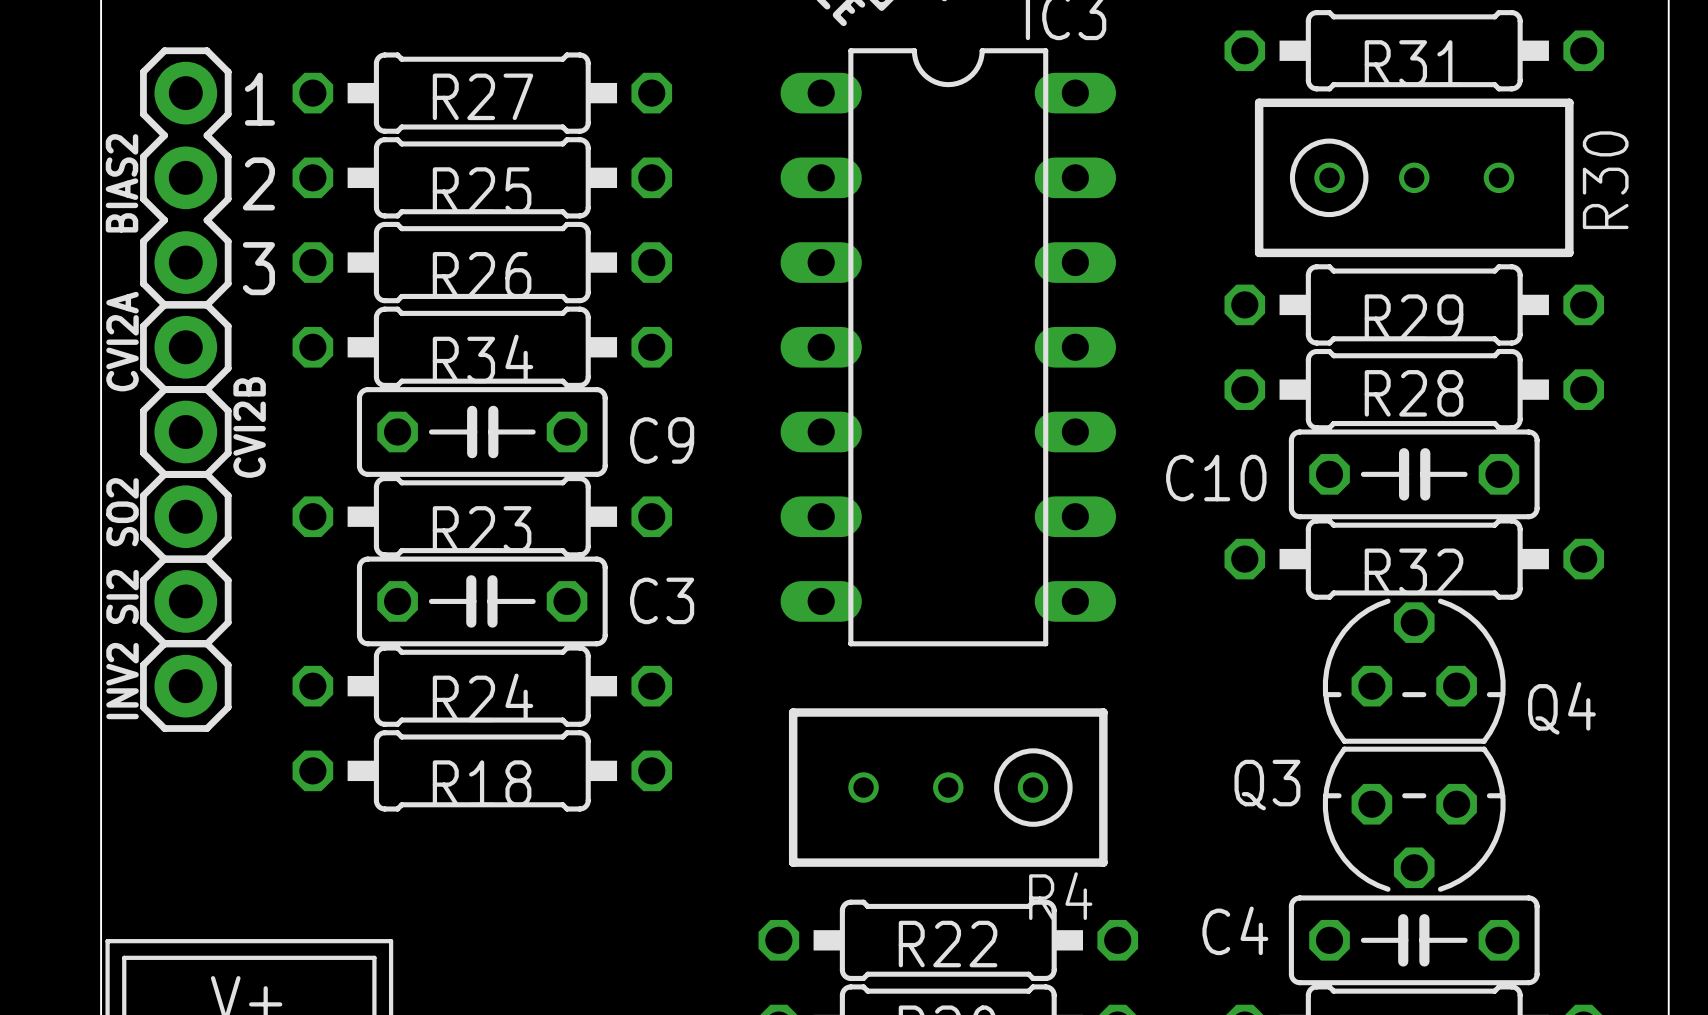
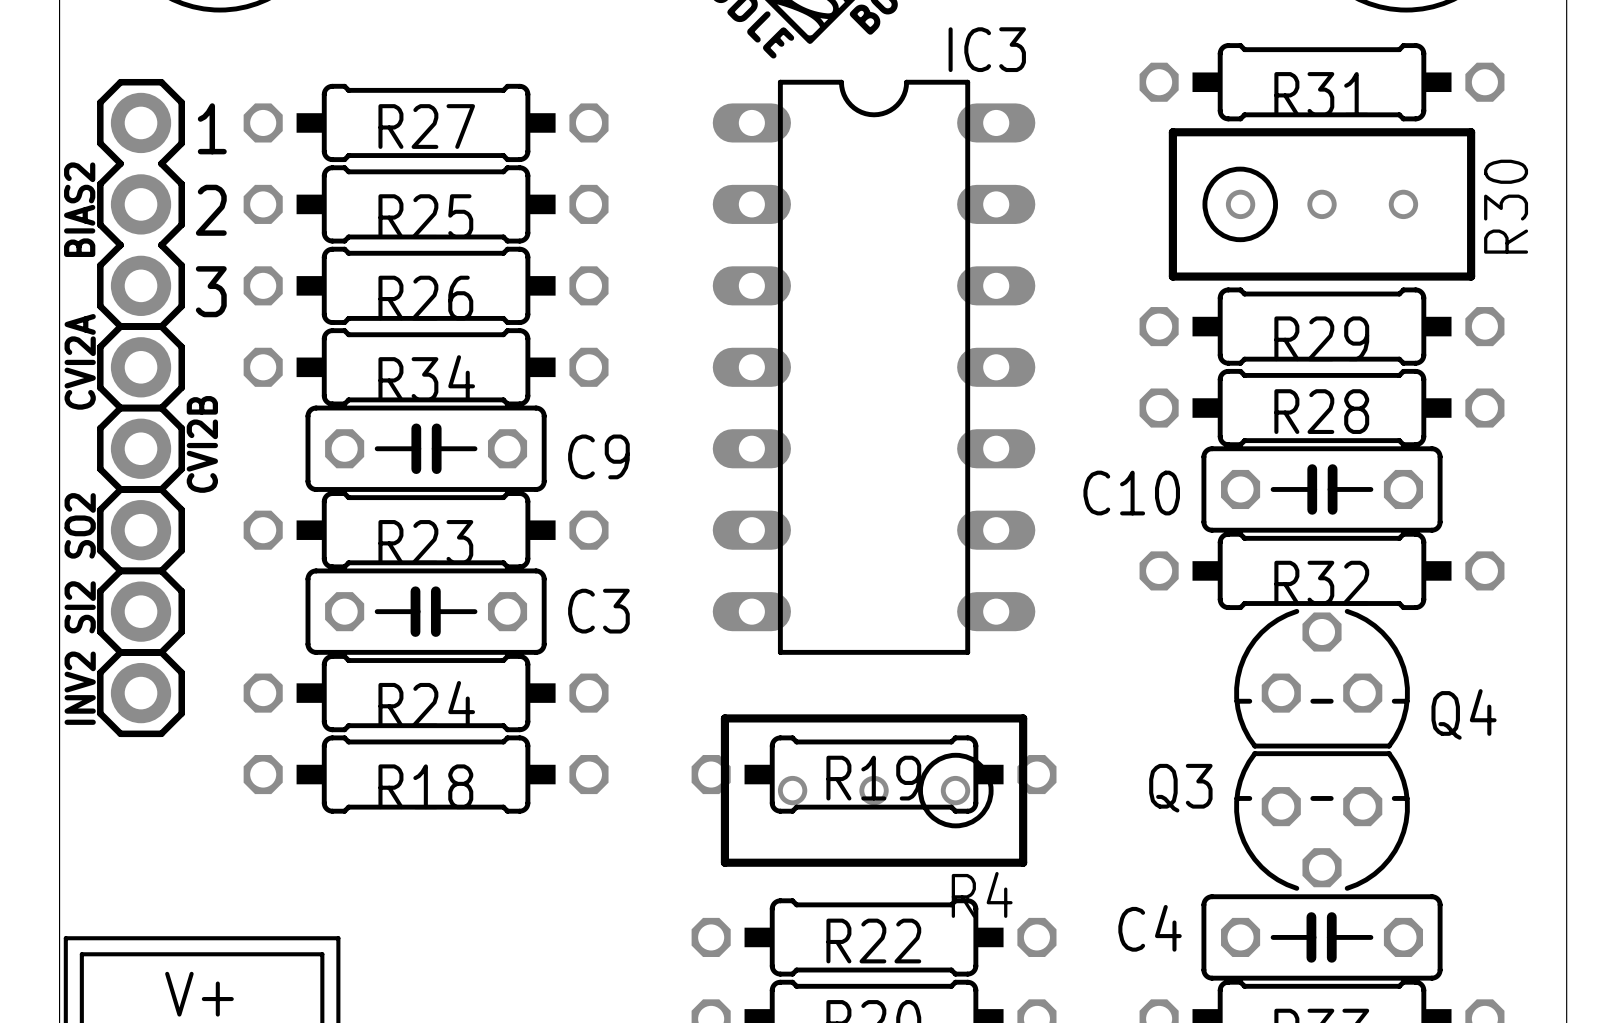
R19: none -> (874, 774)

